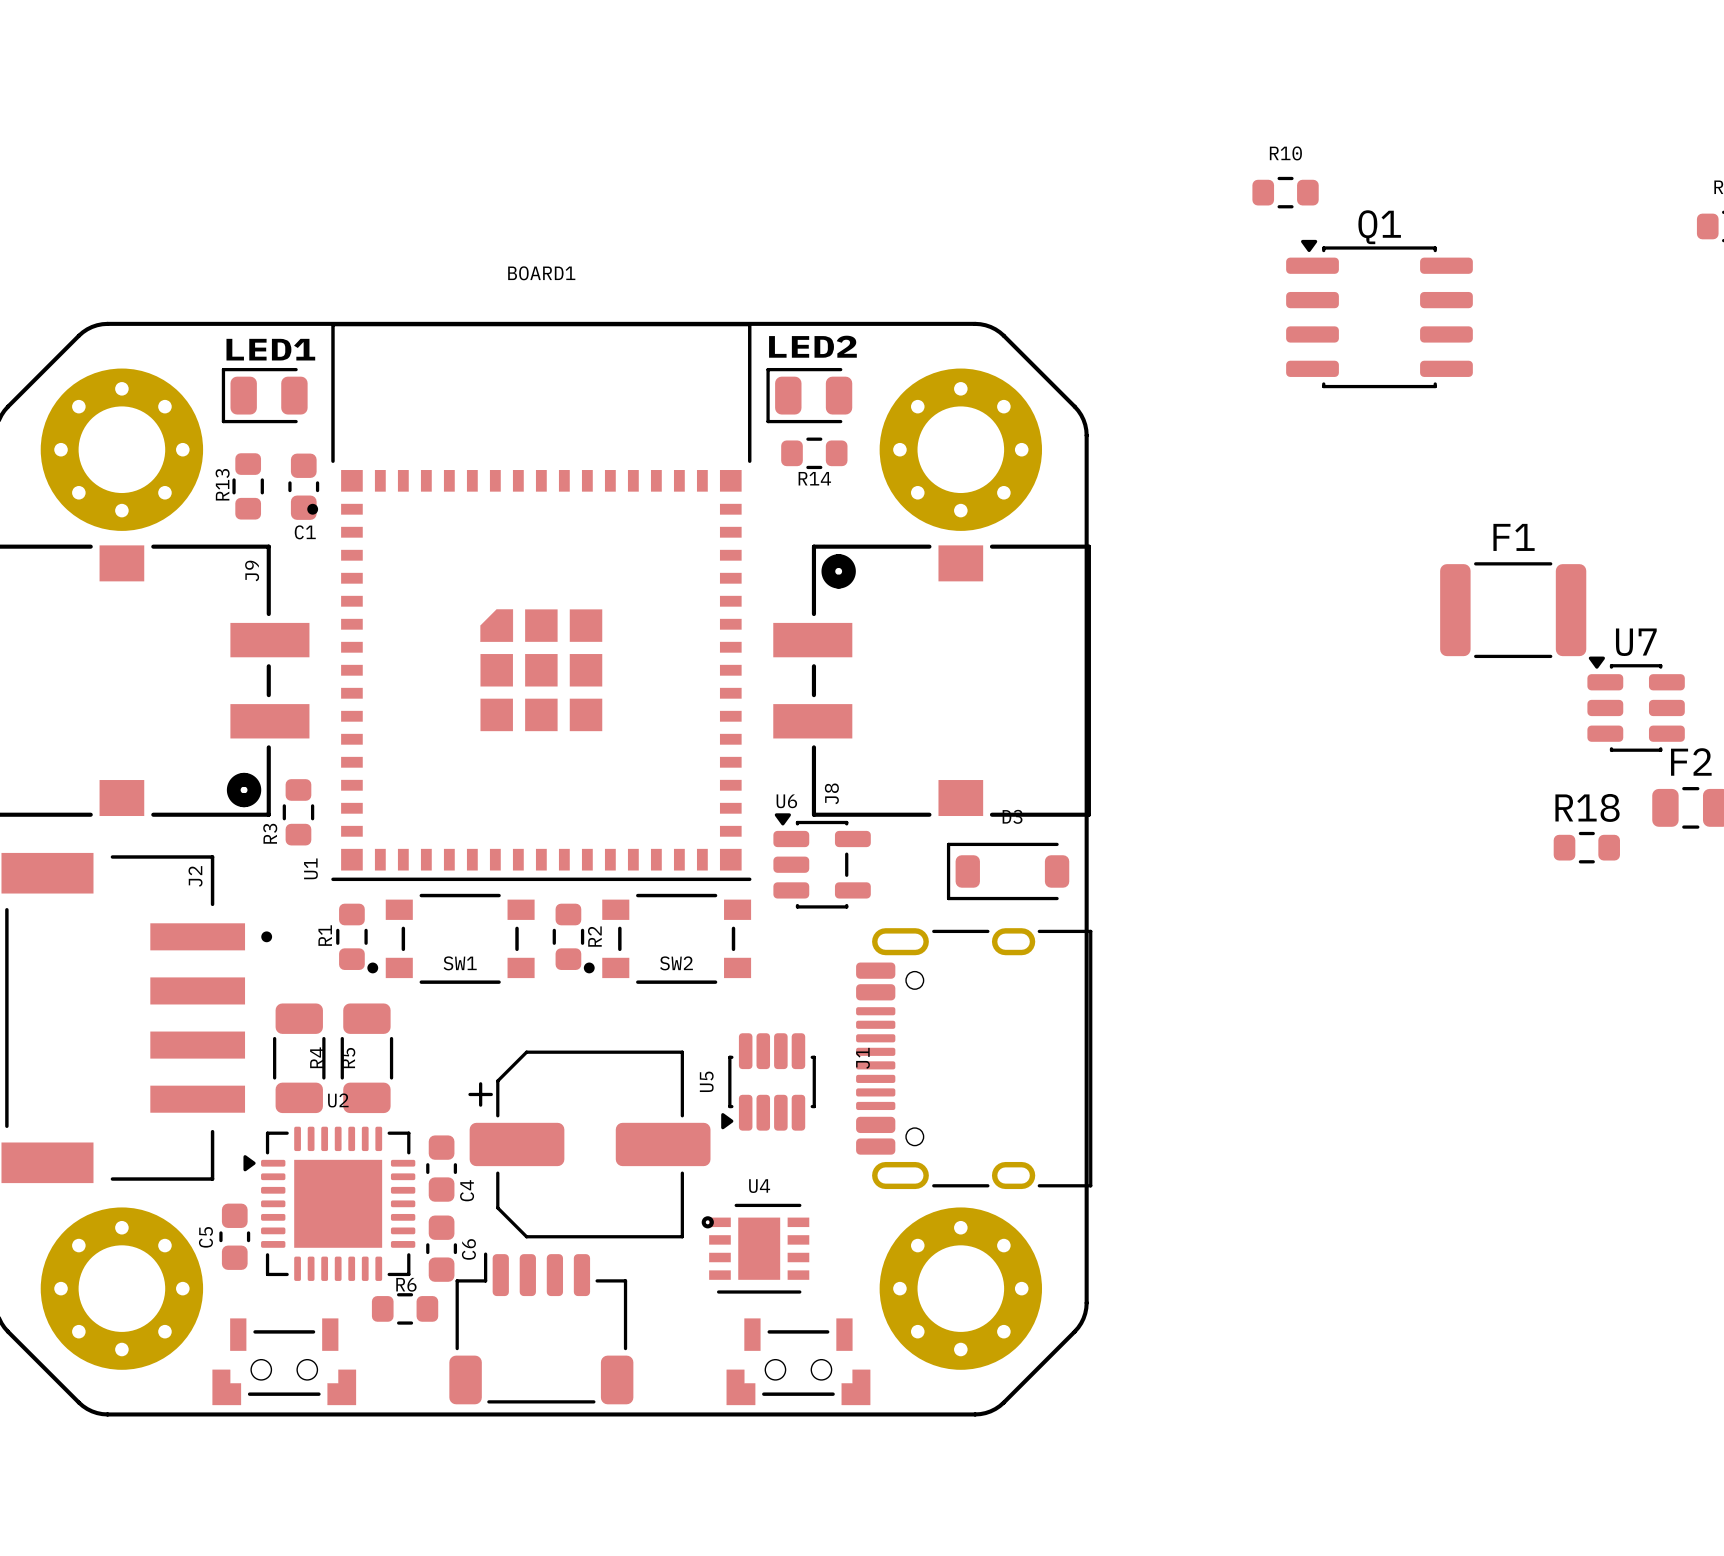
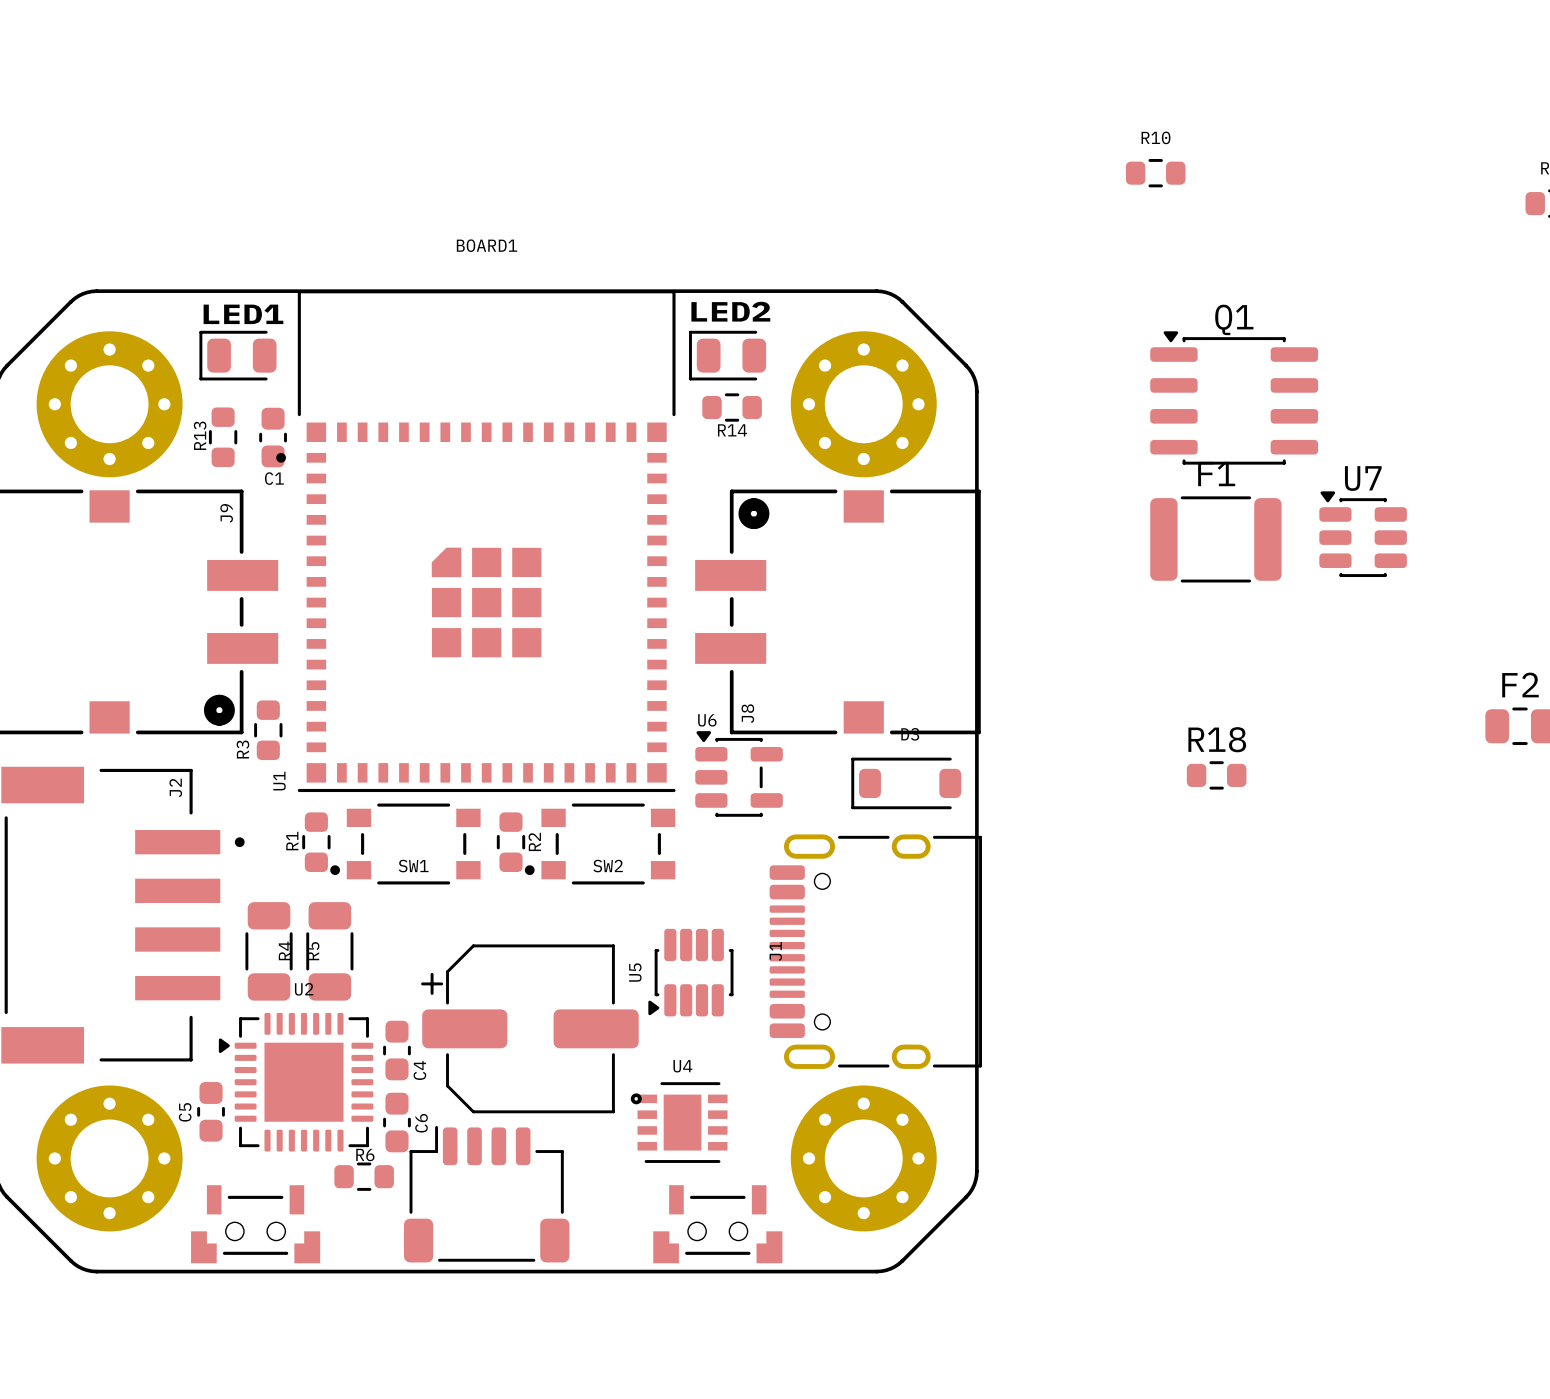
Q1 position: (1379, 314) -> (1234, 397)
F1 position: (1513, 610) -> (1215, 539)
U7 position: (1636, 704) -> (1363, 534)
R18 position: (1586, 847) -> (1216, 775)

